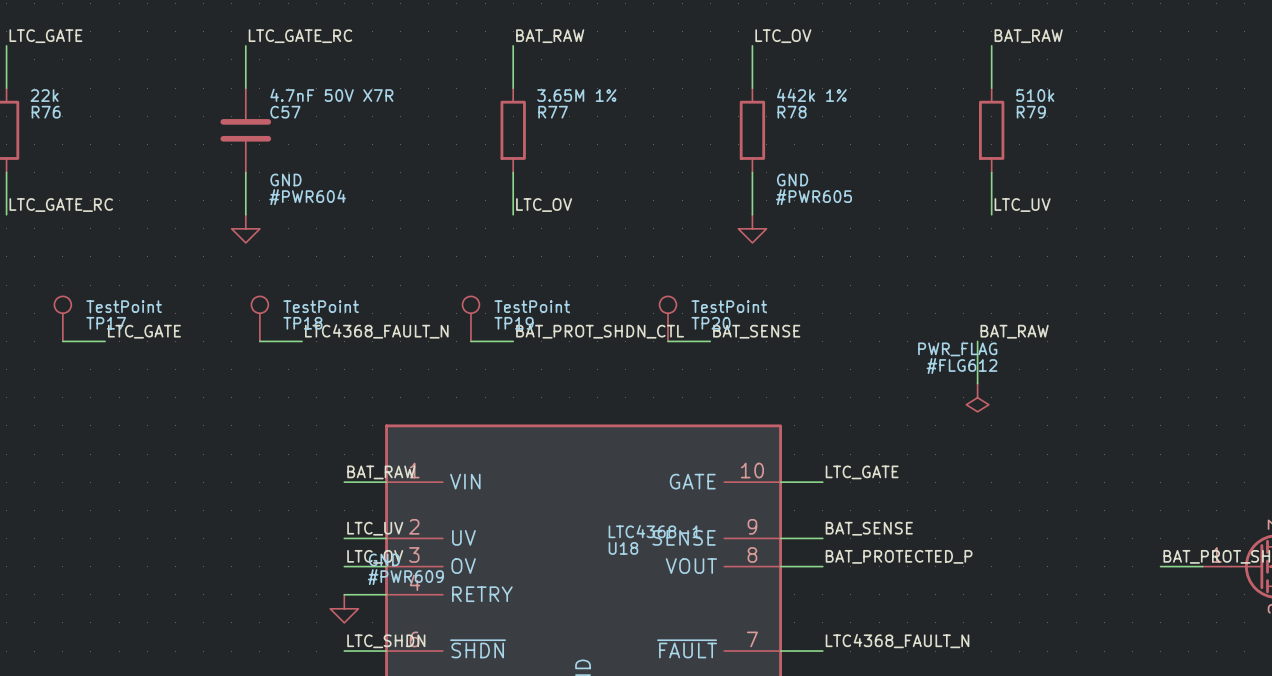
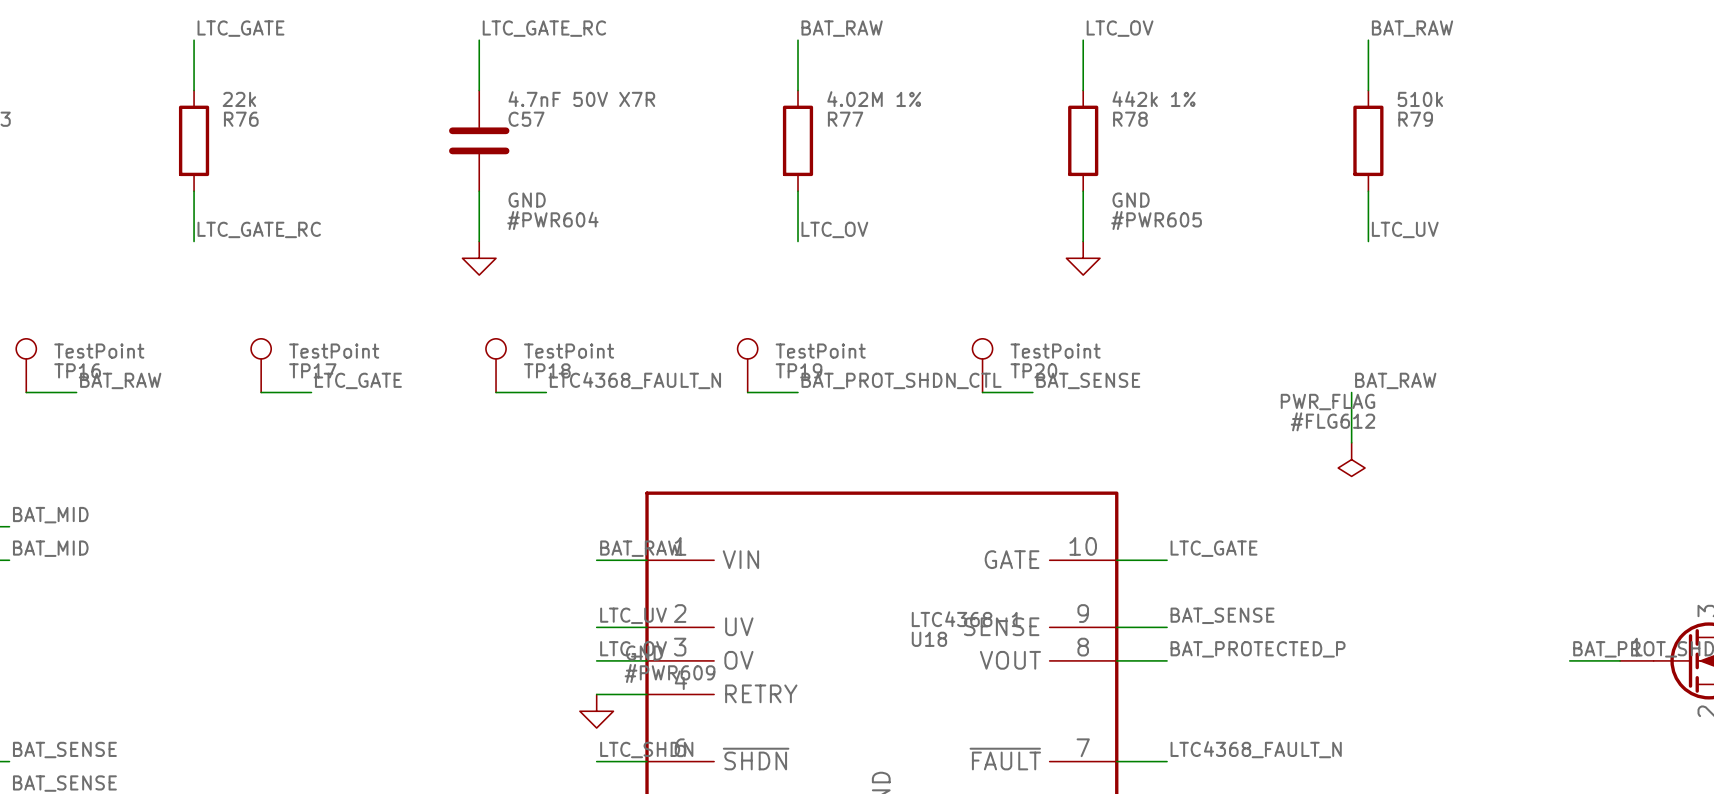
R77 value: 3.65M 1% (576, 95) -> 4.02M 1% (874, 99)

